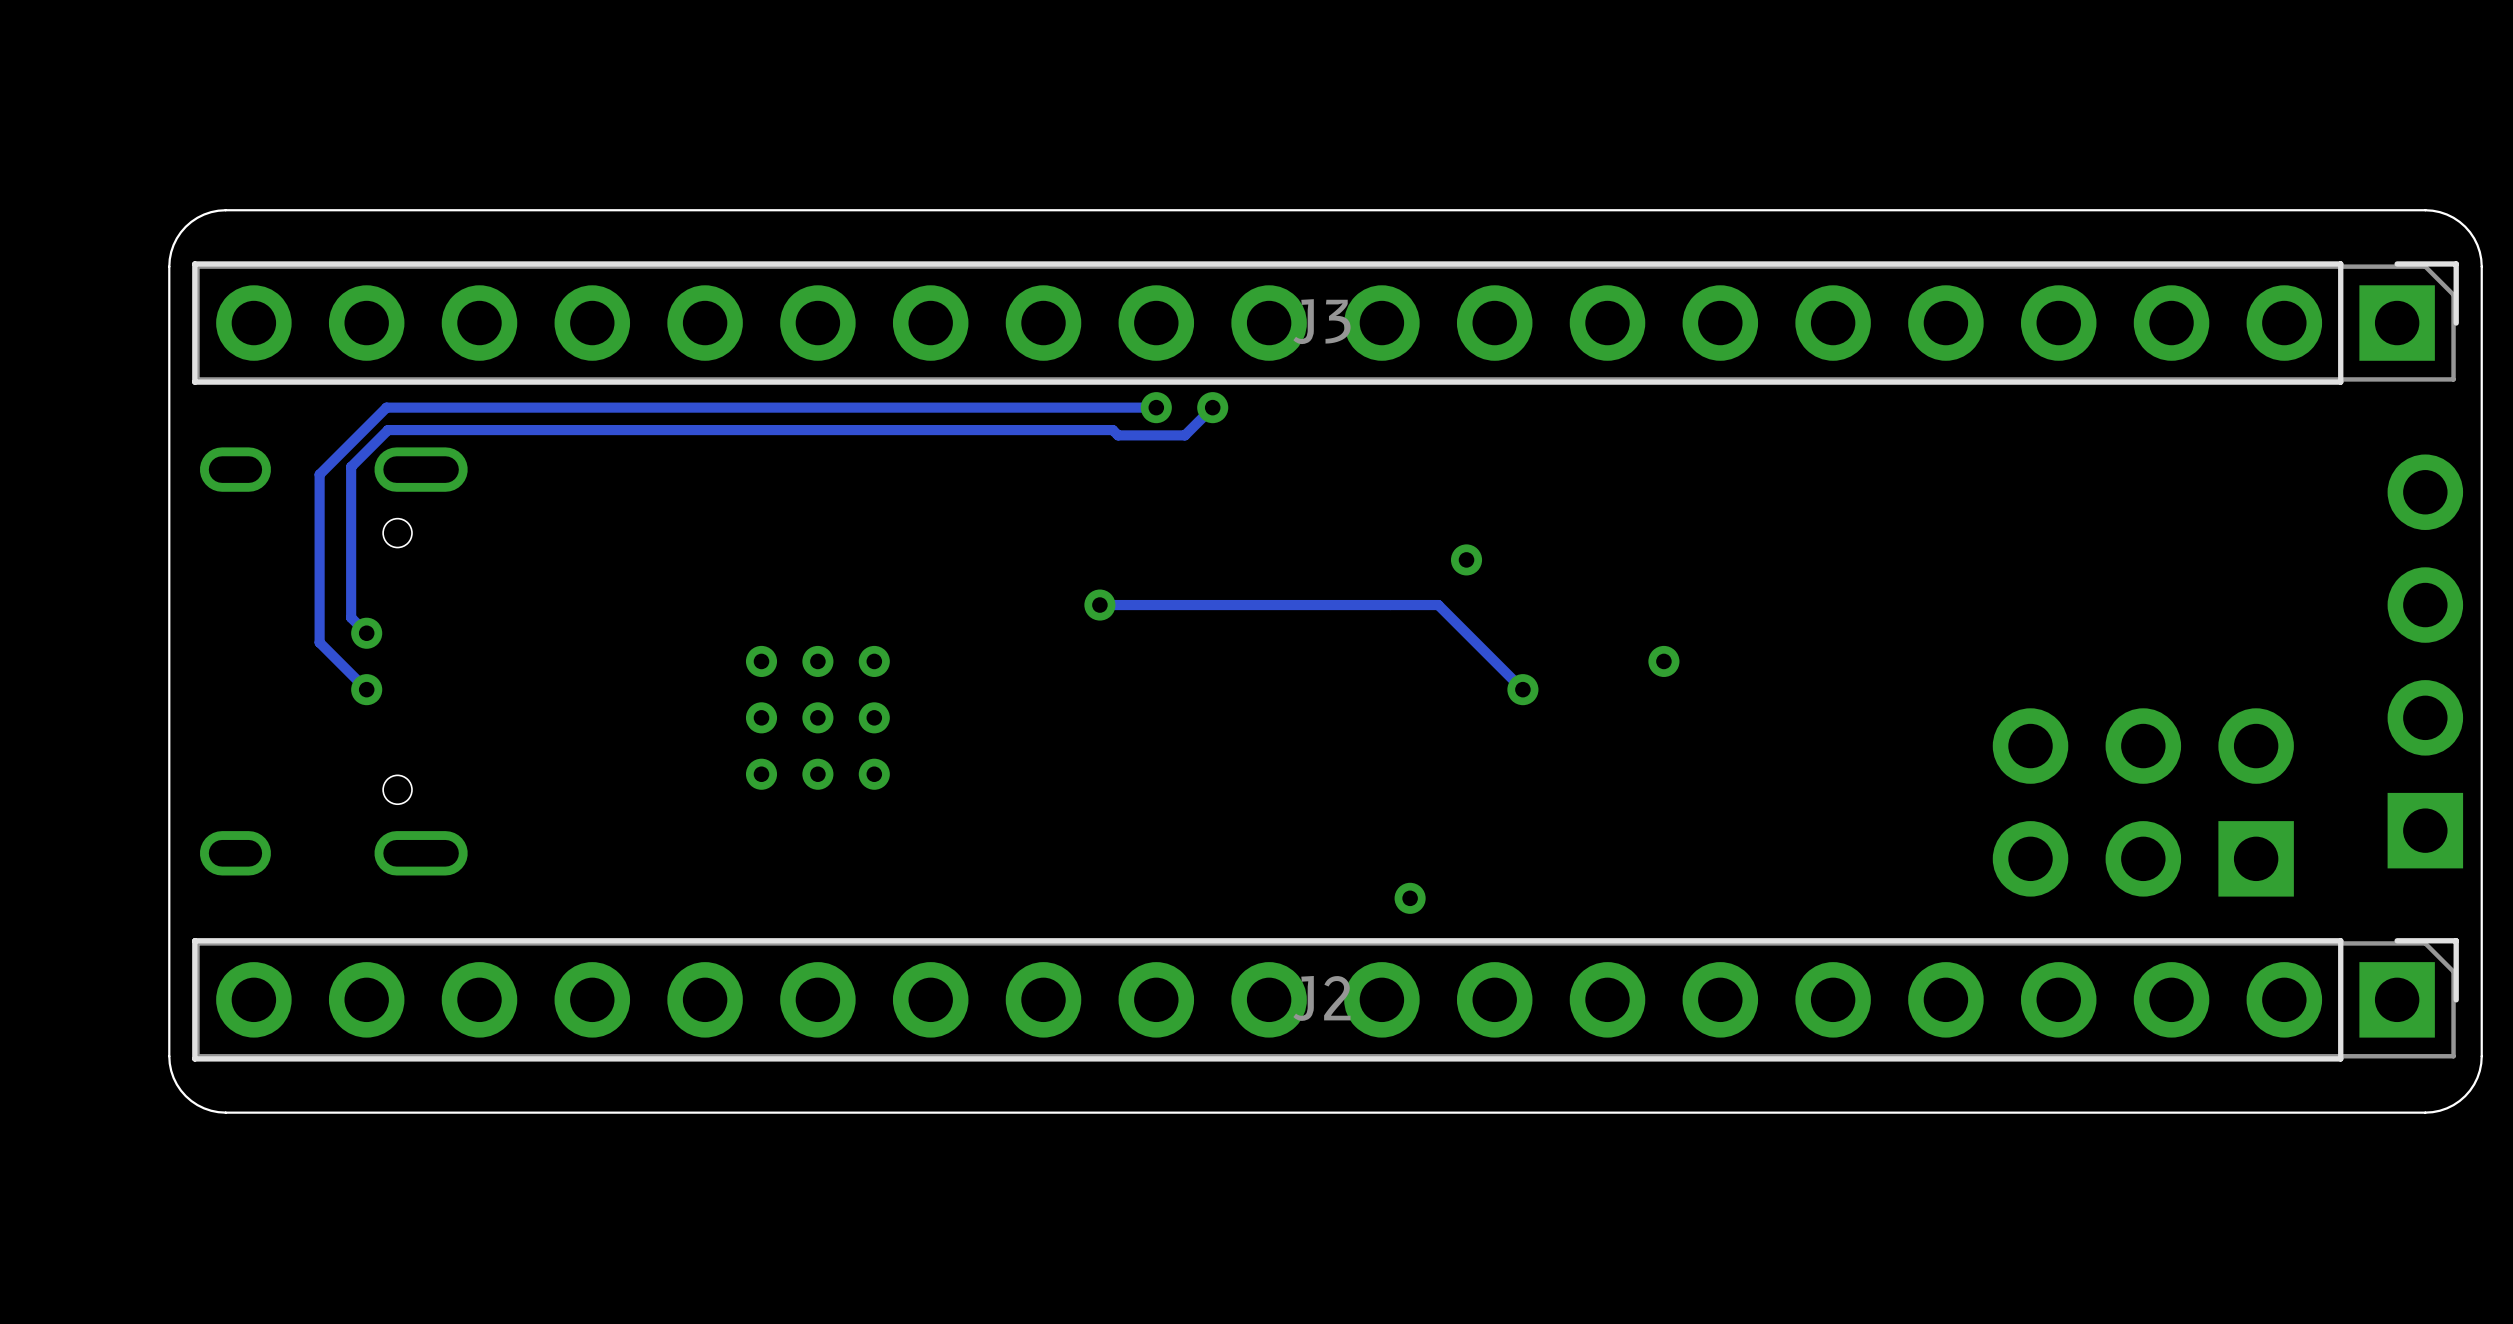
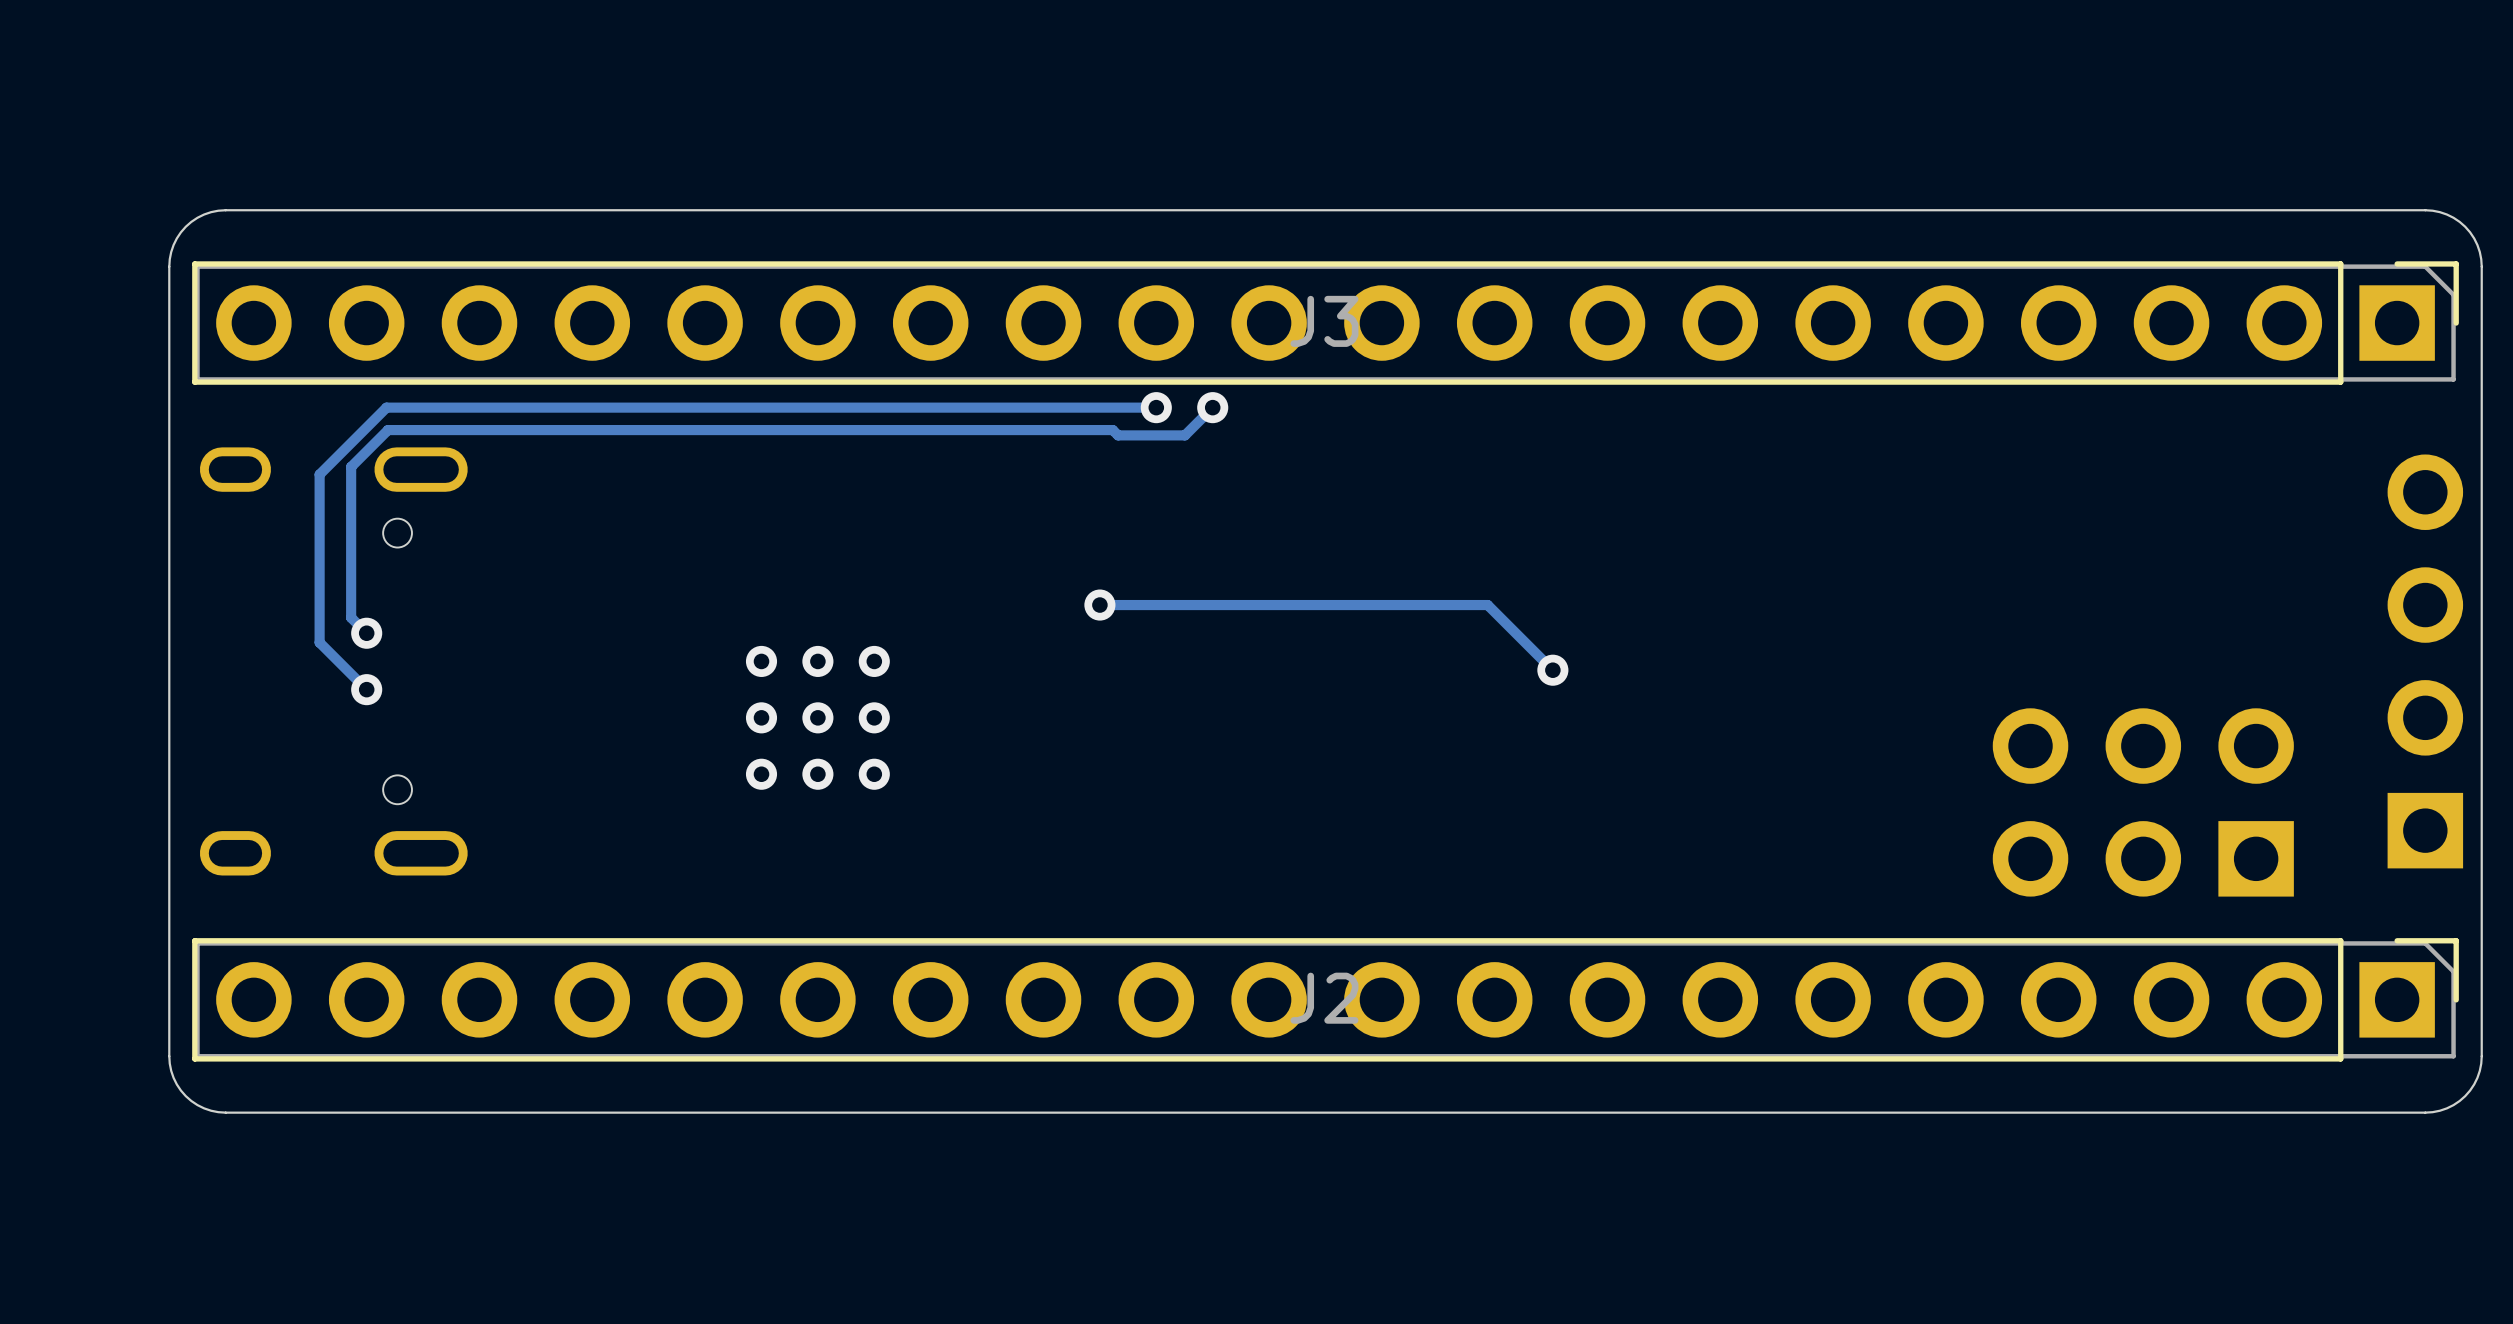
via: (1466, 559) -> none
track: (1438, 605) (1522, 689) -> (1438, 605) (1487, 605) (1552, 670)
via: (1663, 661) -> none
via position: (1522, 689) -> (1552, 670)
via: (1410, 898) -> none

